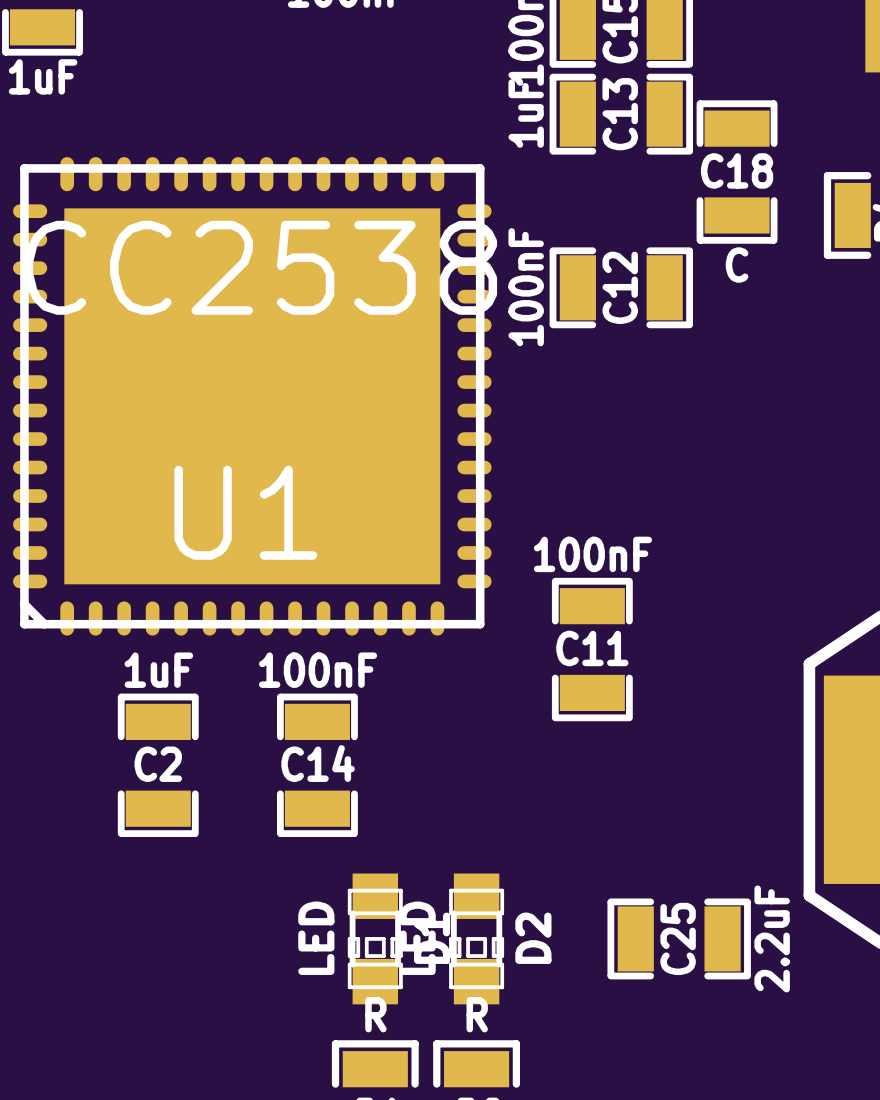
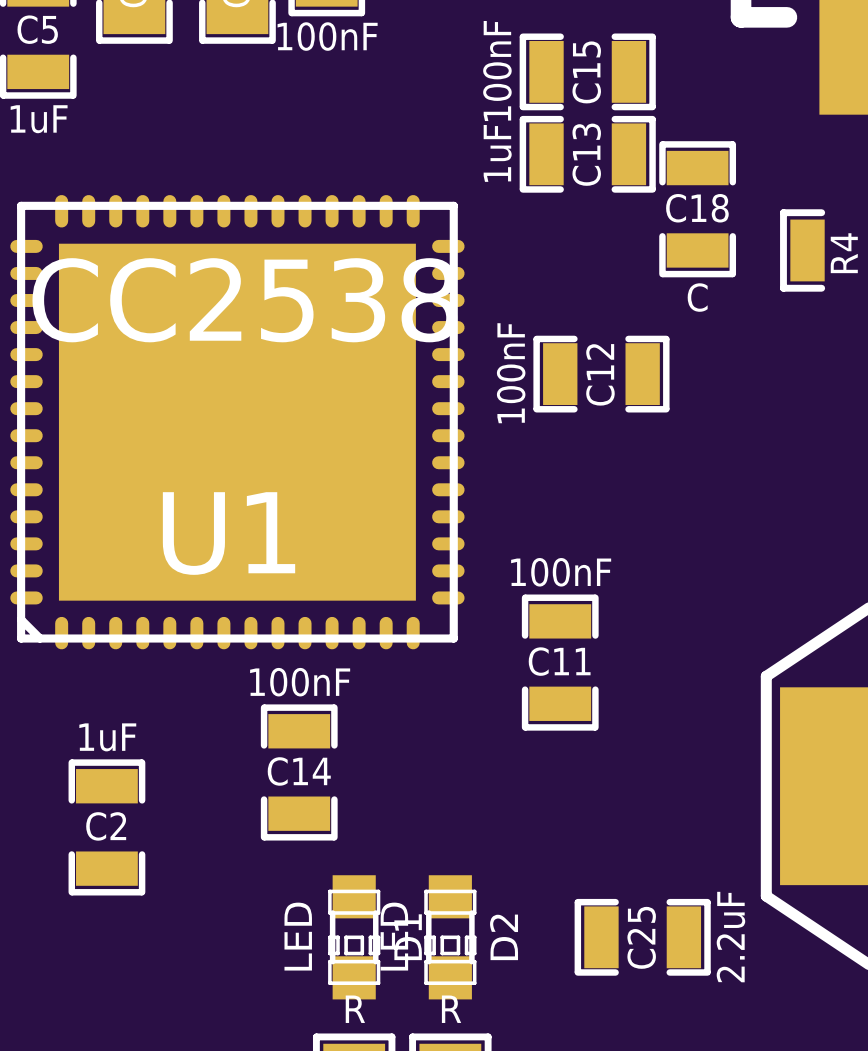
C12 position: (621, 287) -> (601, 374)
C2 position: (158, 765) -> (106, 827)

